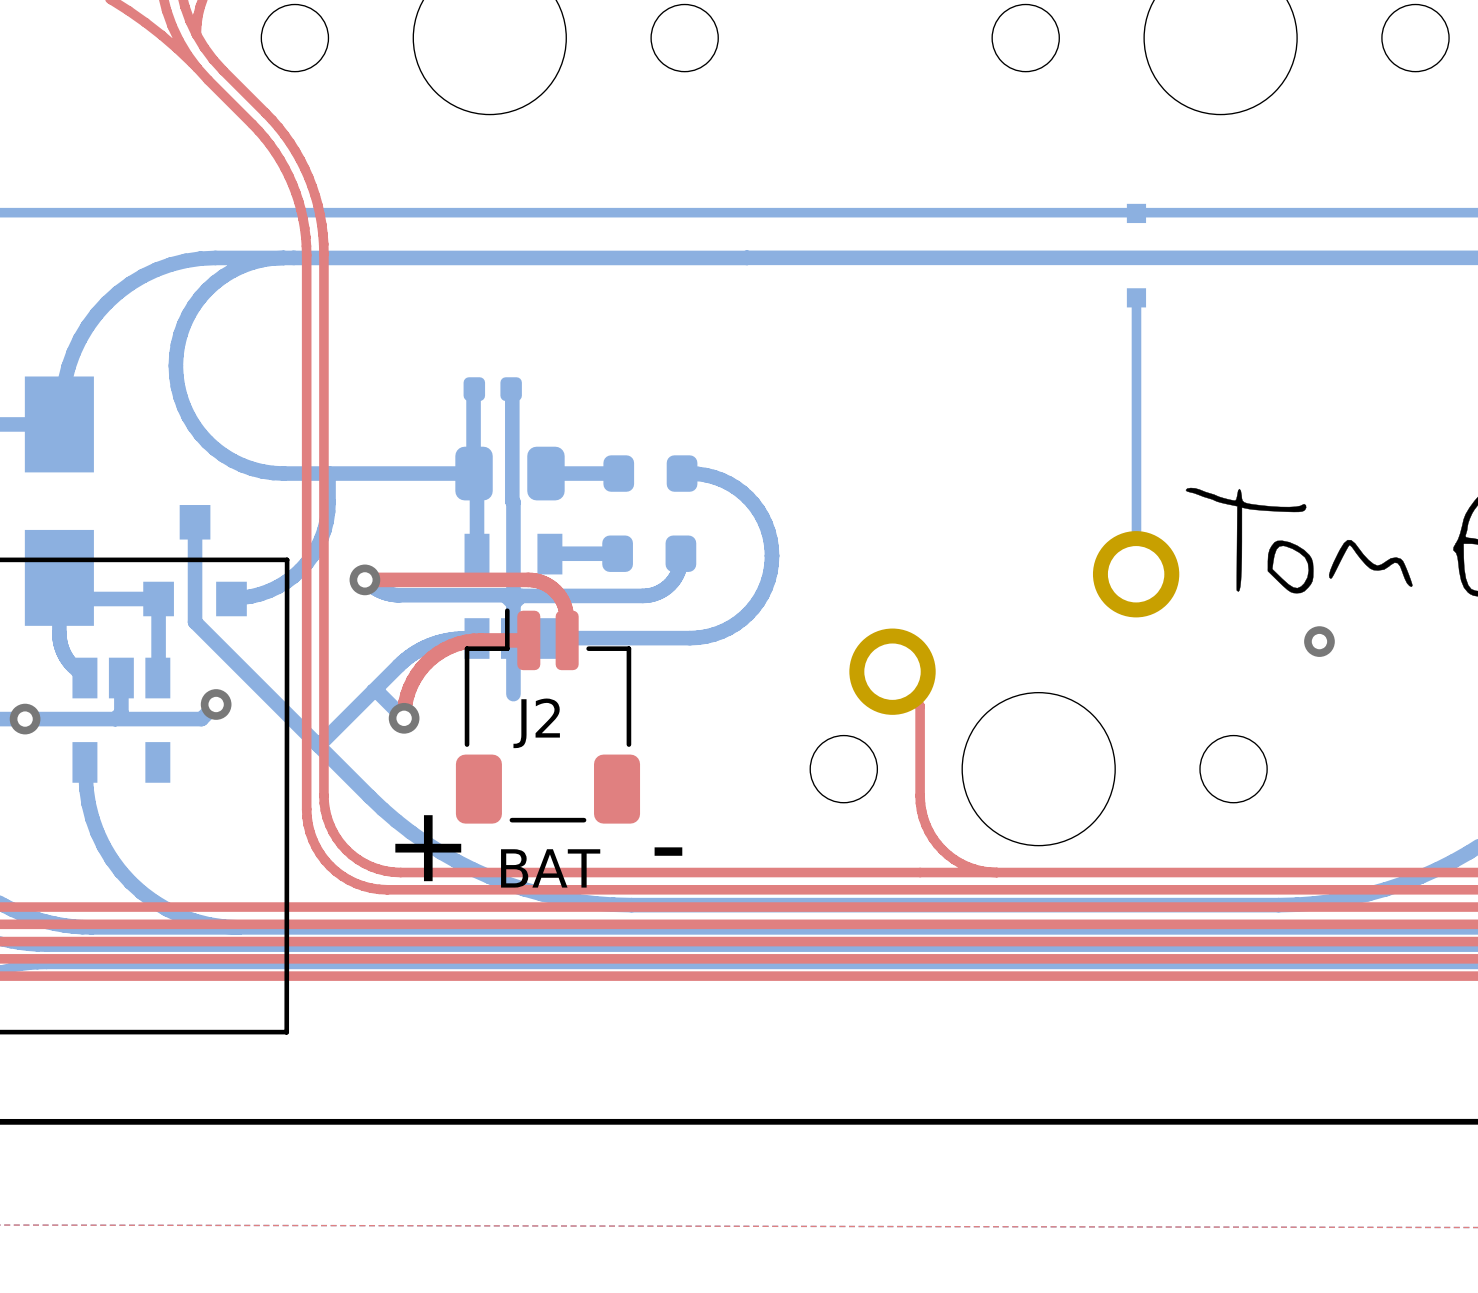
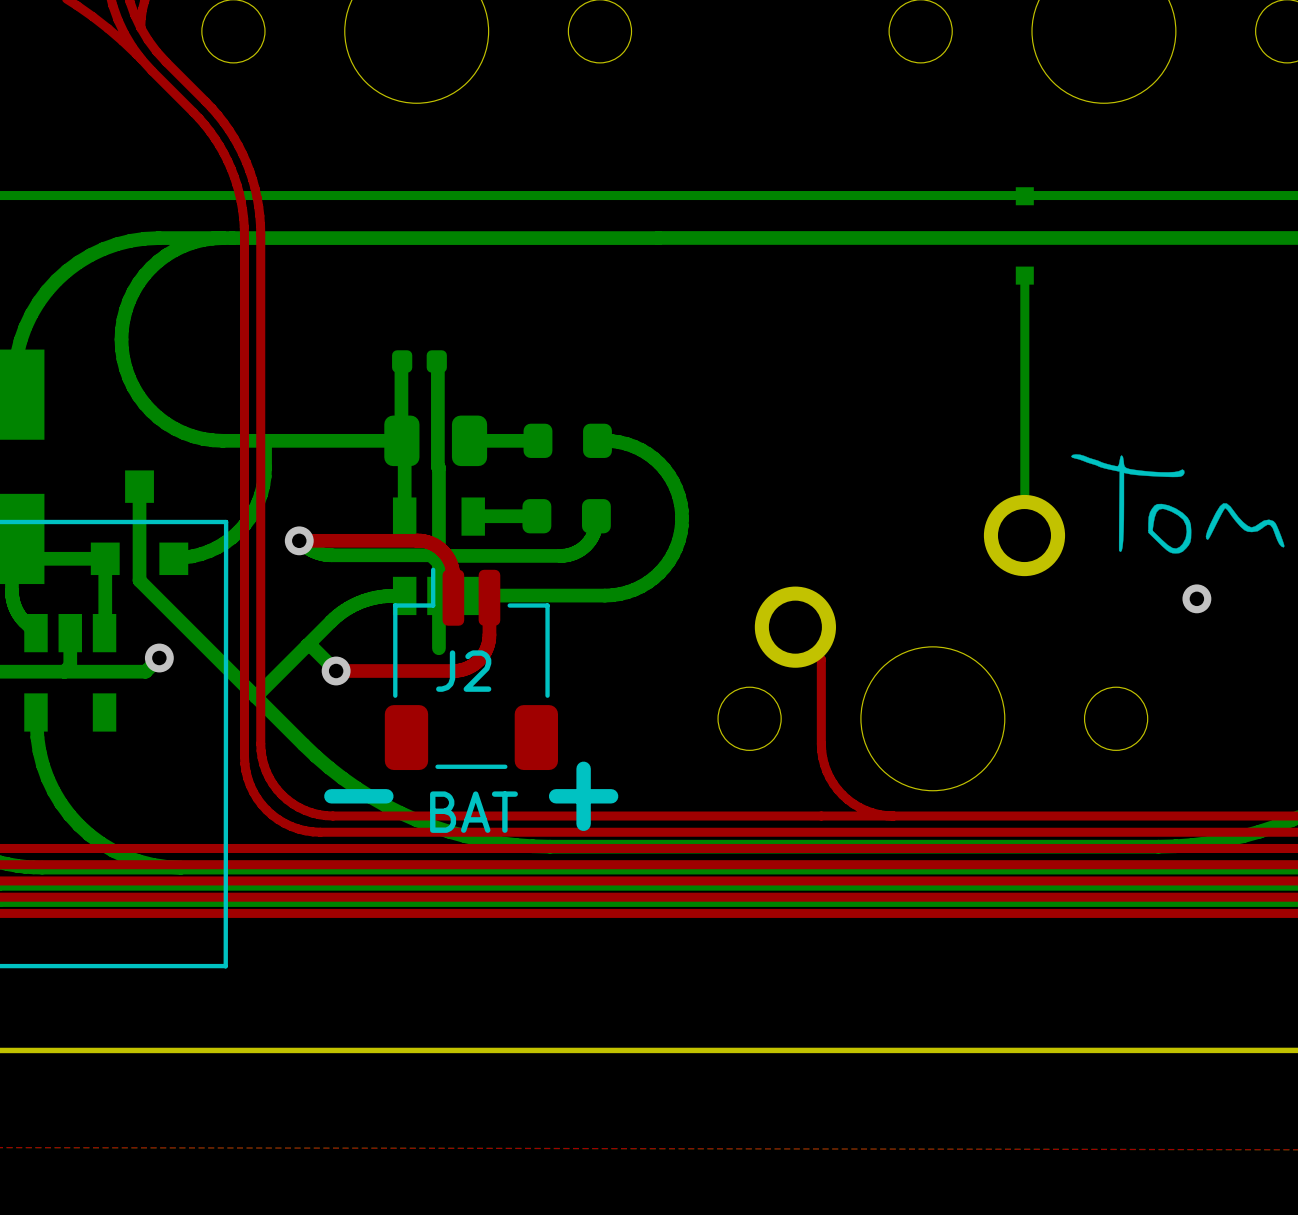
top track: (489, 579) (532, 580) (543, 582) (552, 588) (560, 596) (565, 607) (566, 639) -> (417, 540) (434, 544) (447, 556) (452, 569) (453, 596)
top track: (528, 640) (473, 640) (451, 646) (438, 653) (426, 662) (413, 680) (405, 702) (404, 717) -> (489, 597) (487, 645) (481, 657) (470, 666) (453, 670) (336, 670)
text: + (428, 848) -> - (358, 796)
text: - (668, 851) -> + (583, 796)

